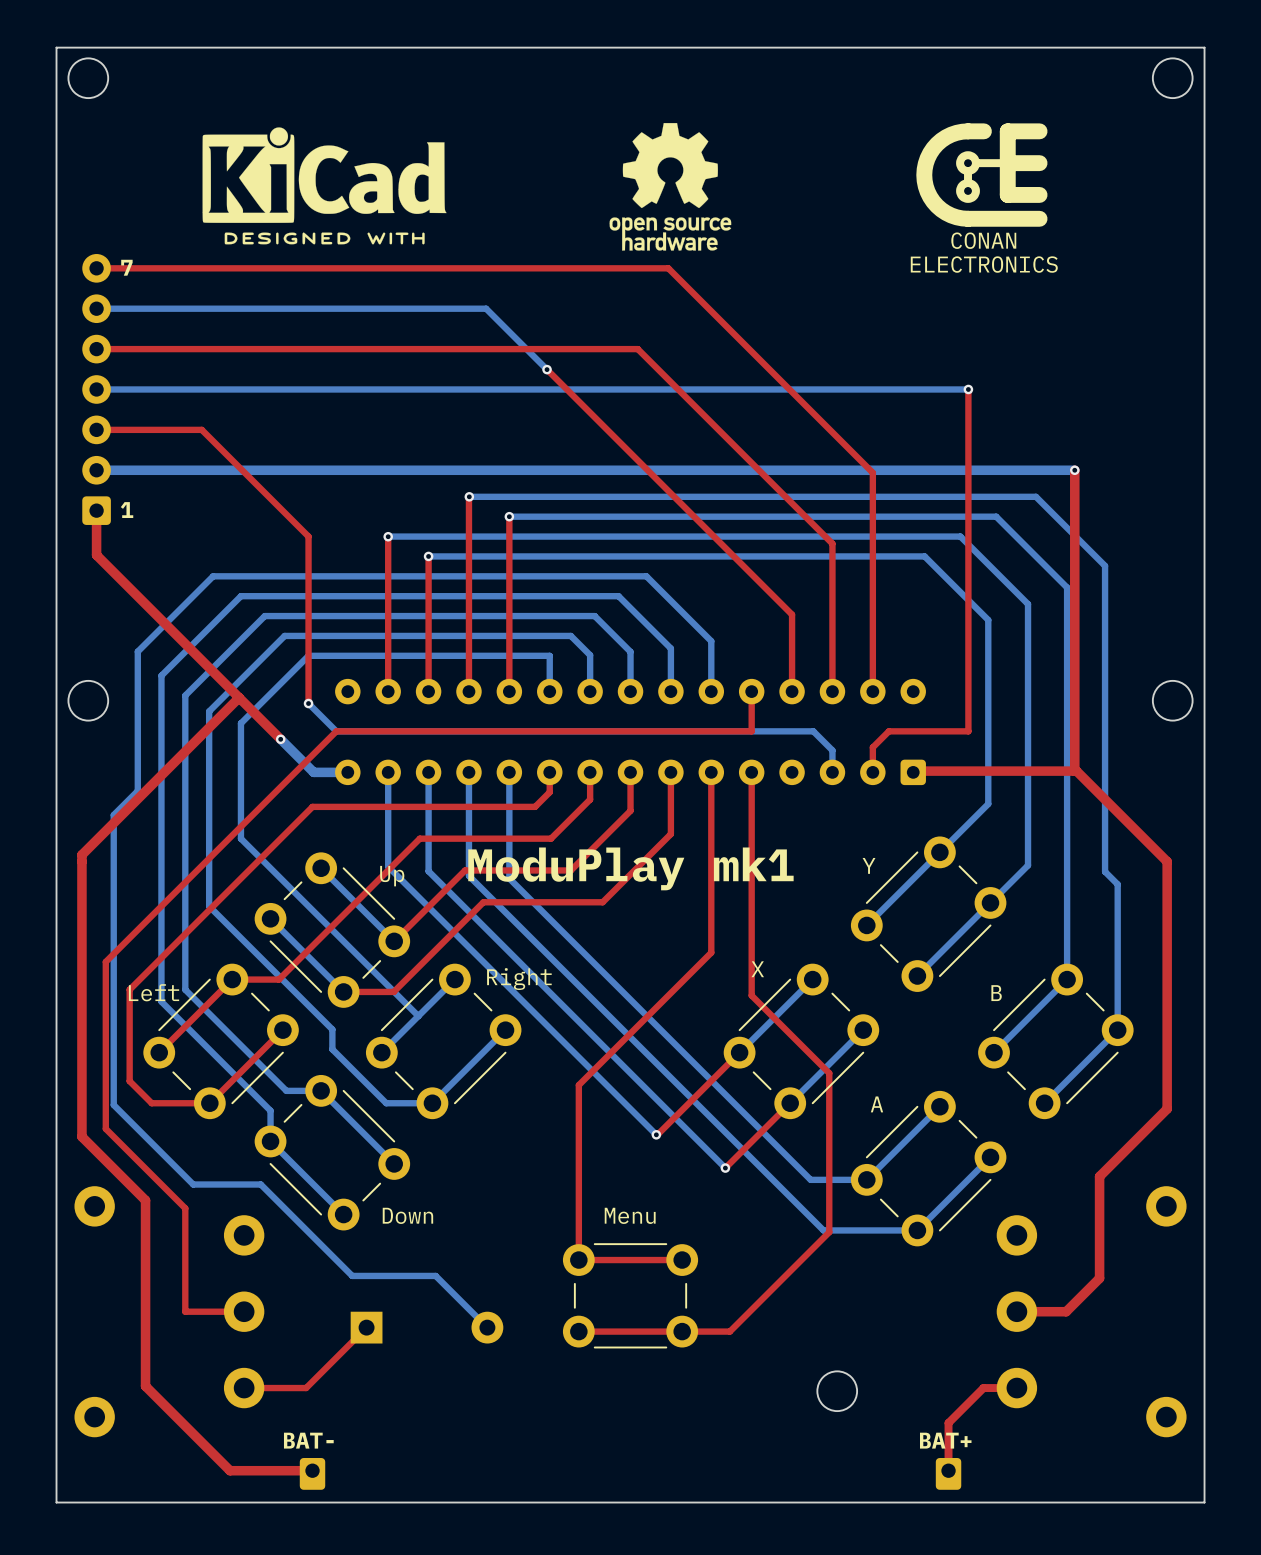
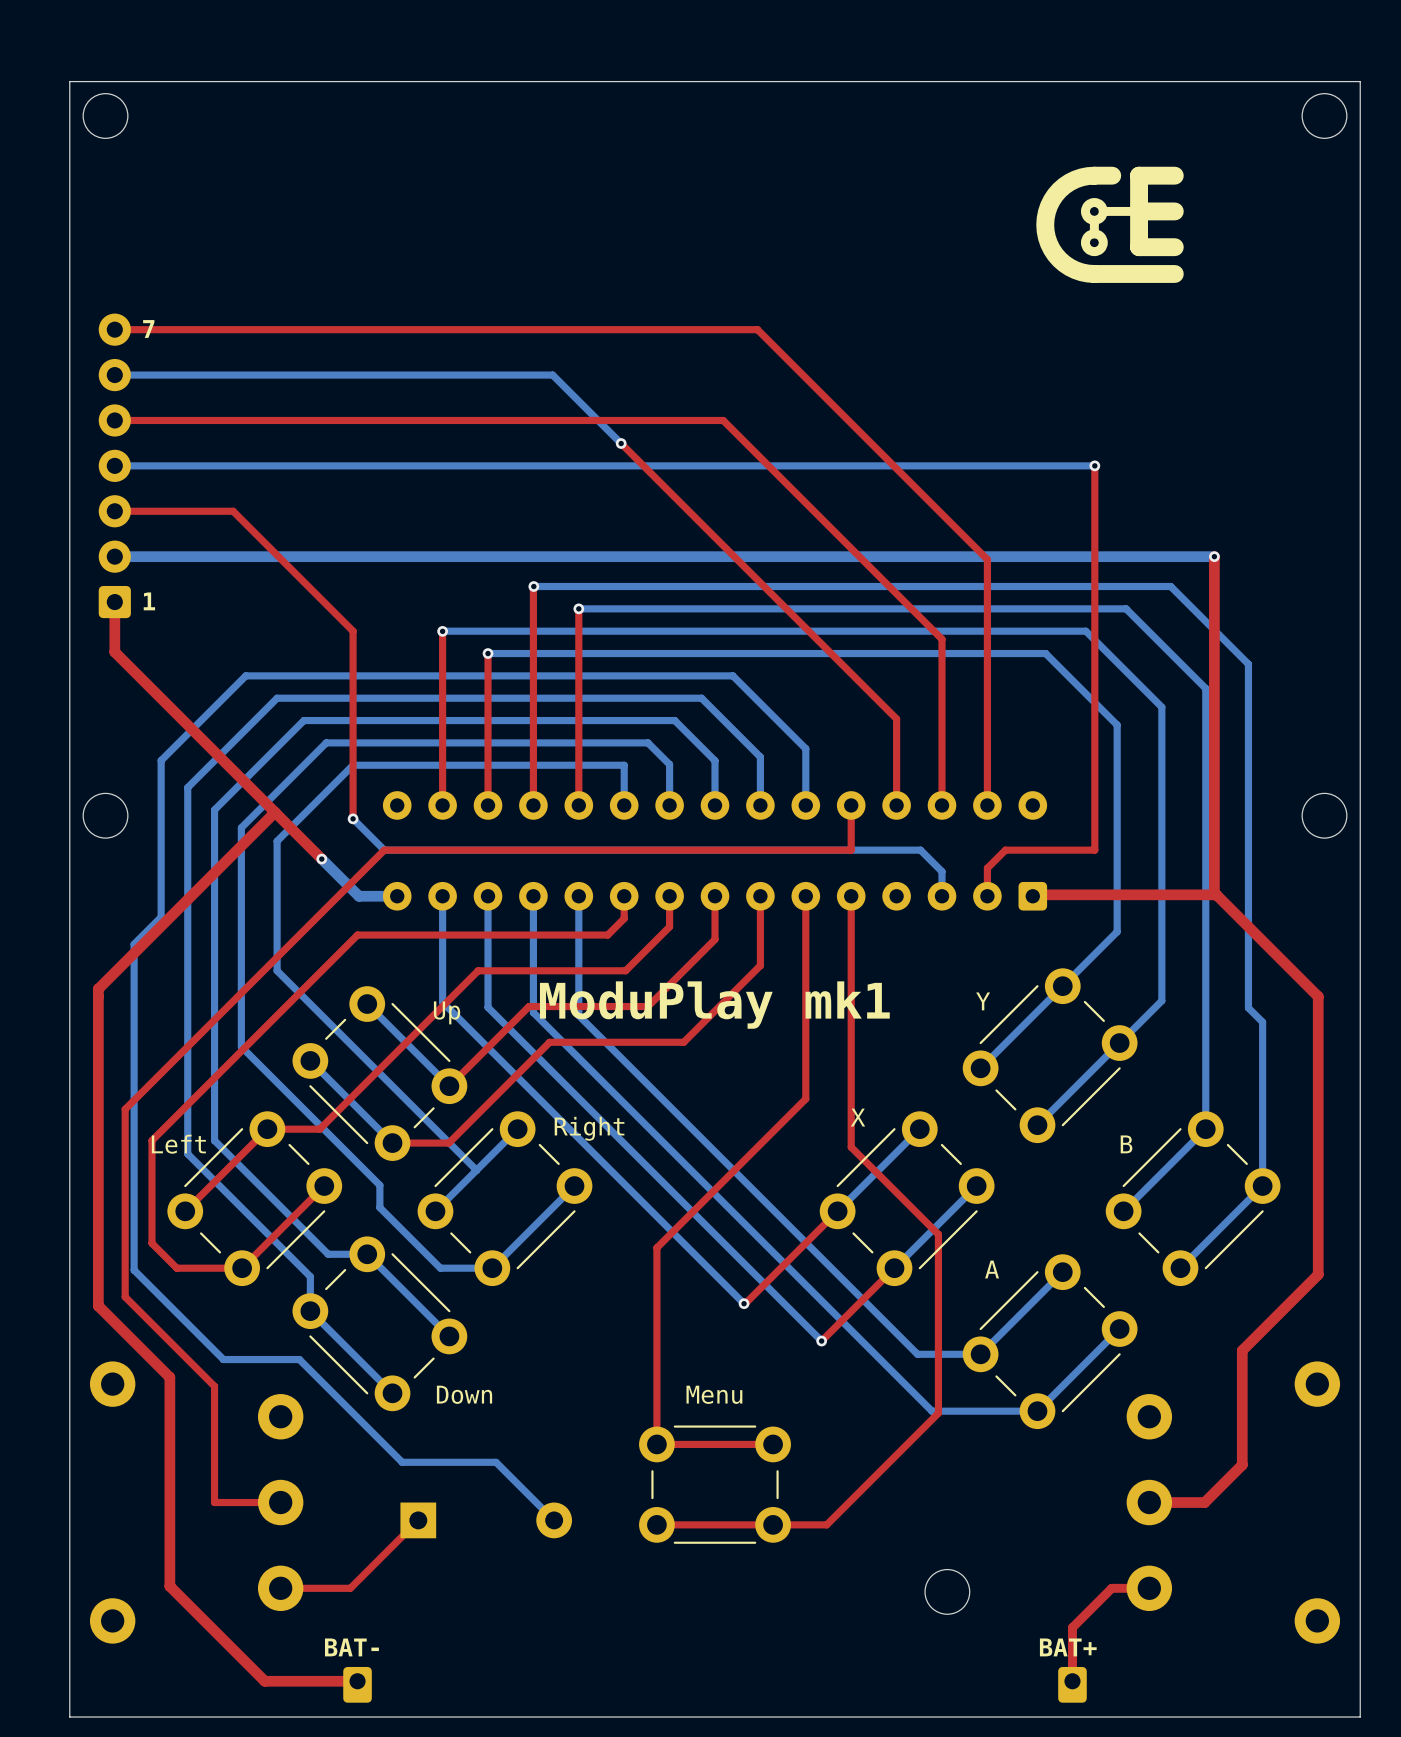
drawing: [609, 123, 732, 251] -> none
drawing shape: [910, 123, 1058, 273] -> [1036, 166, 1184, 283]
drawing: [202, 127, 447, 245] -> none

